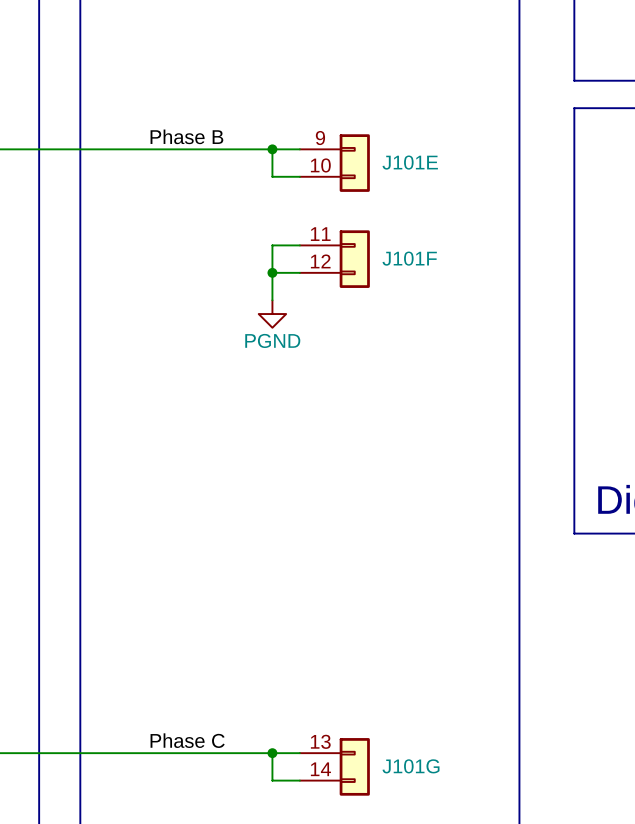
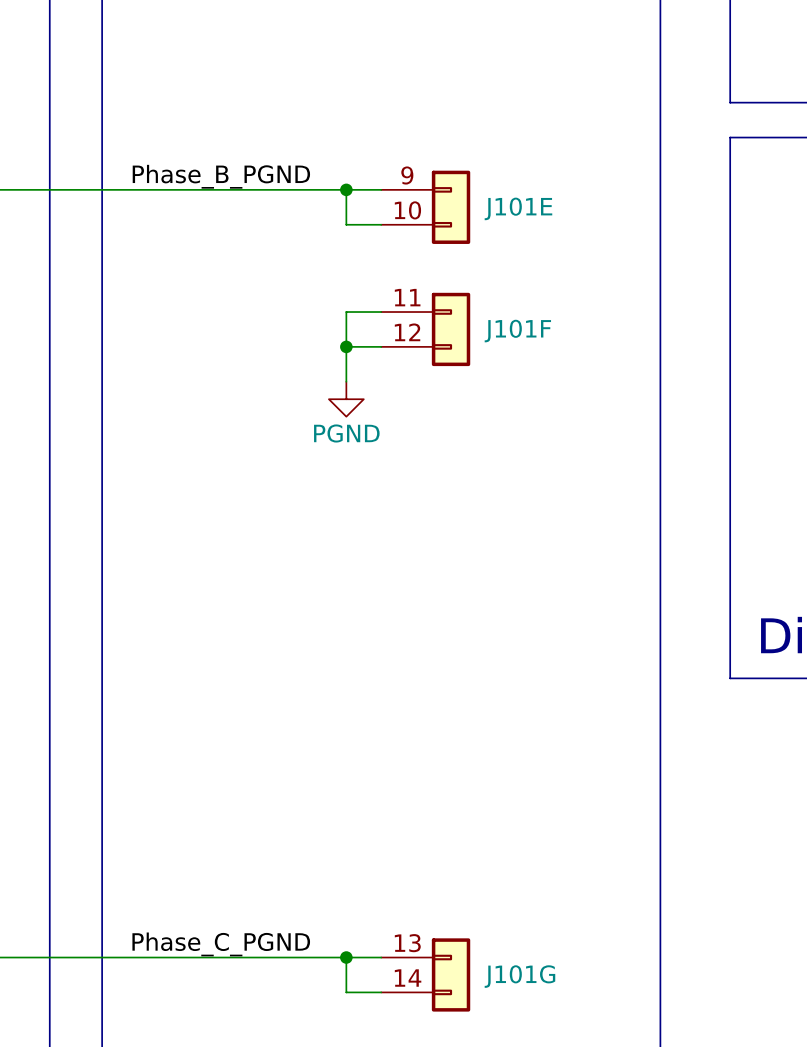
label: Phase B (186, 136) -> Phase_B_PGND (221, 176)
label: Phase C (187, 740) -> Phase_C_PGND (221, 944)

